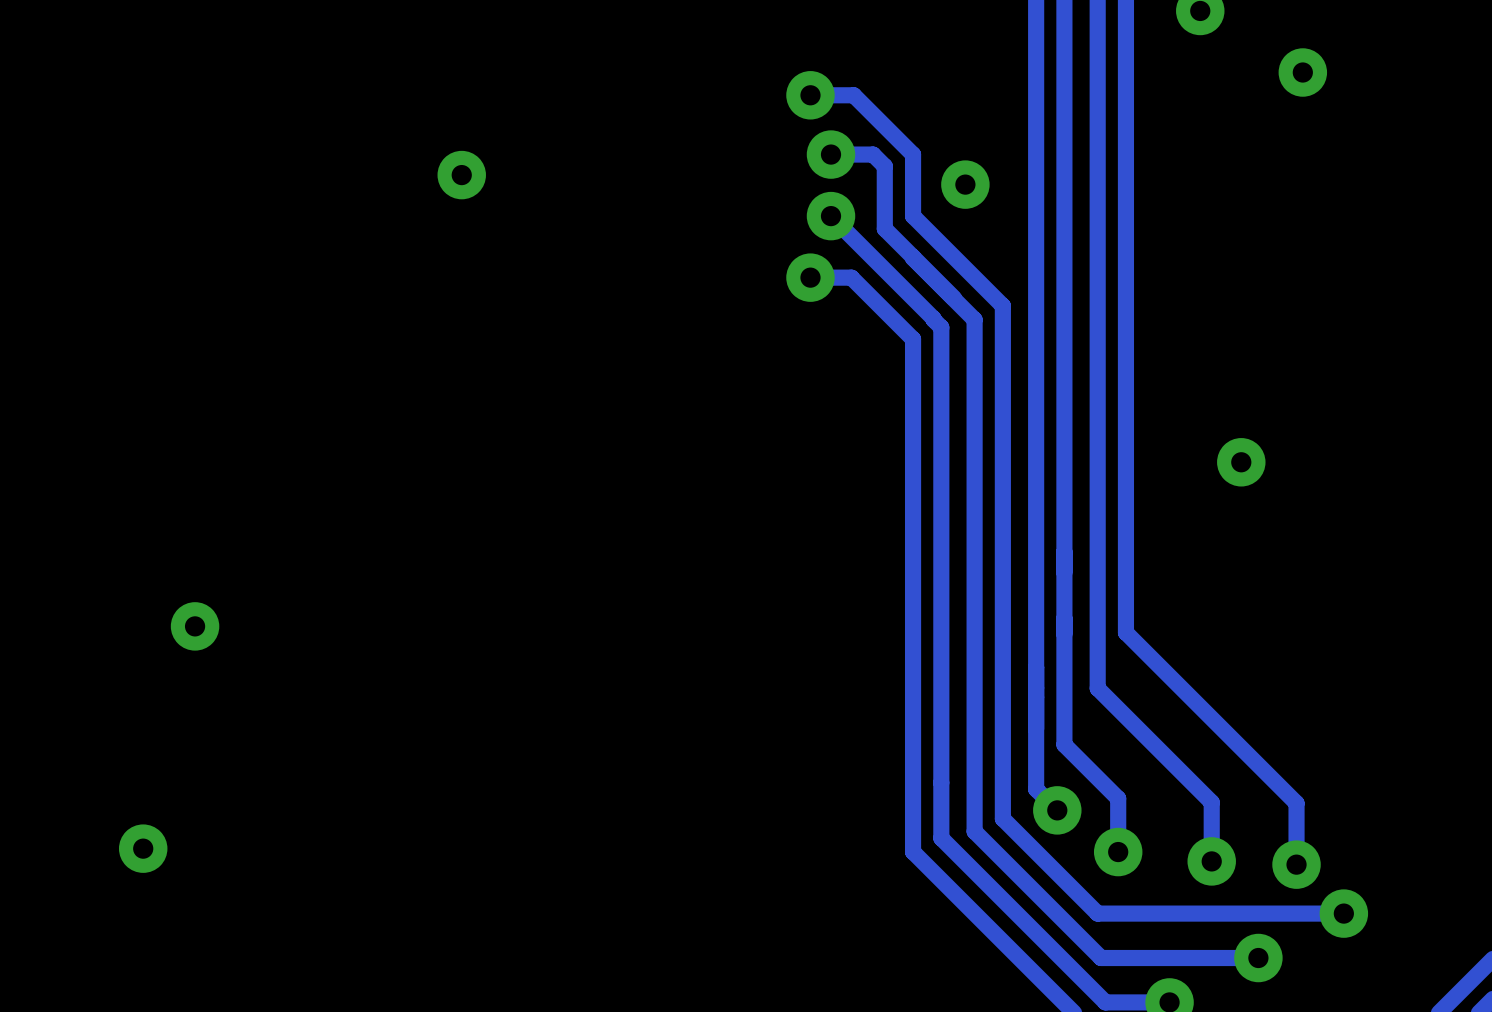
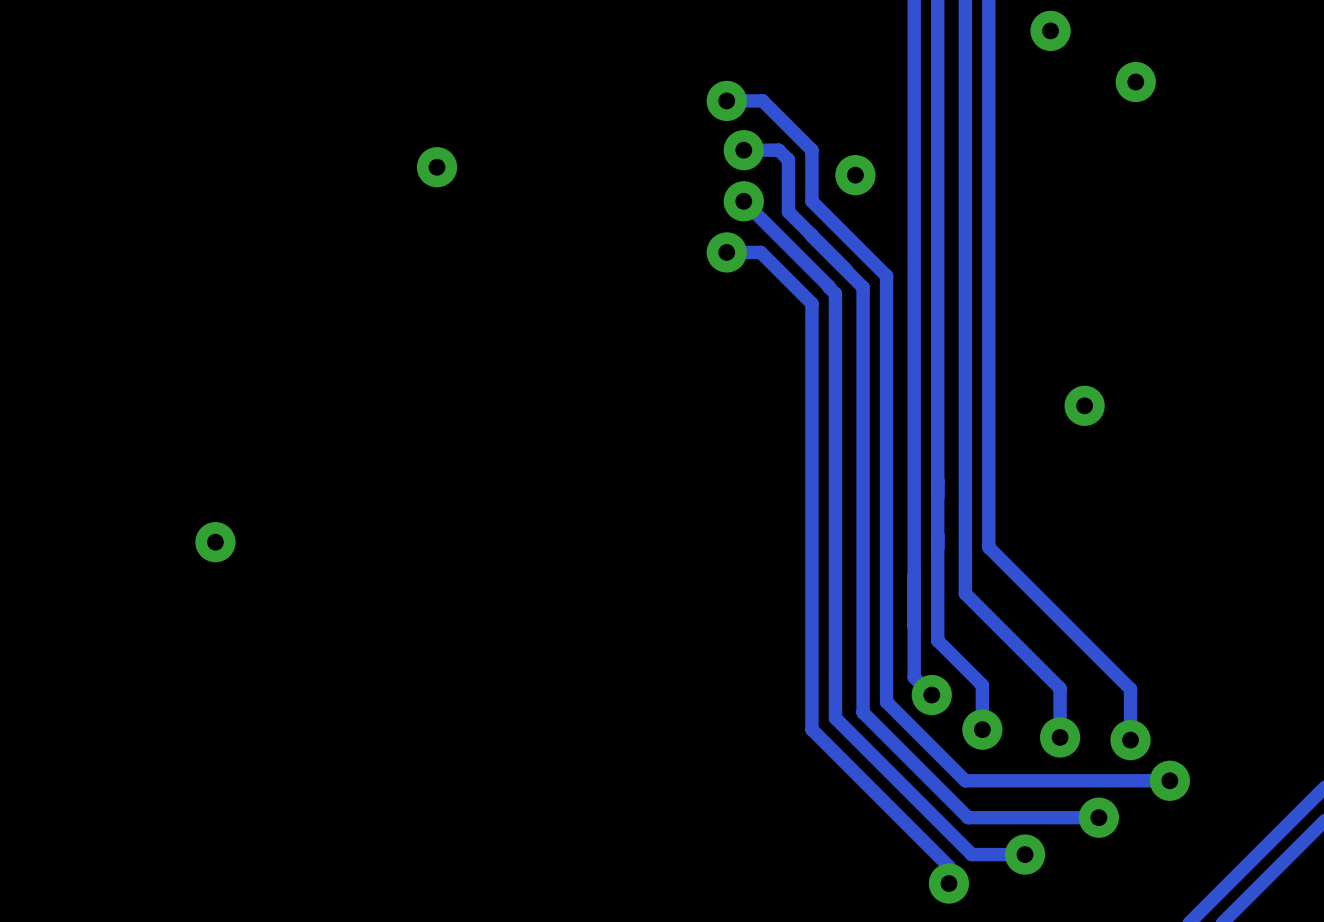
via: (143, 848) -> none

